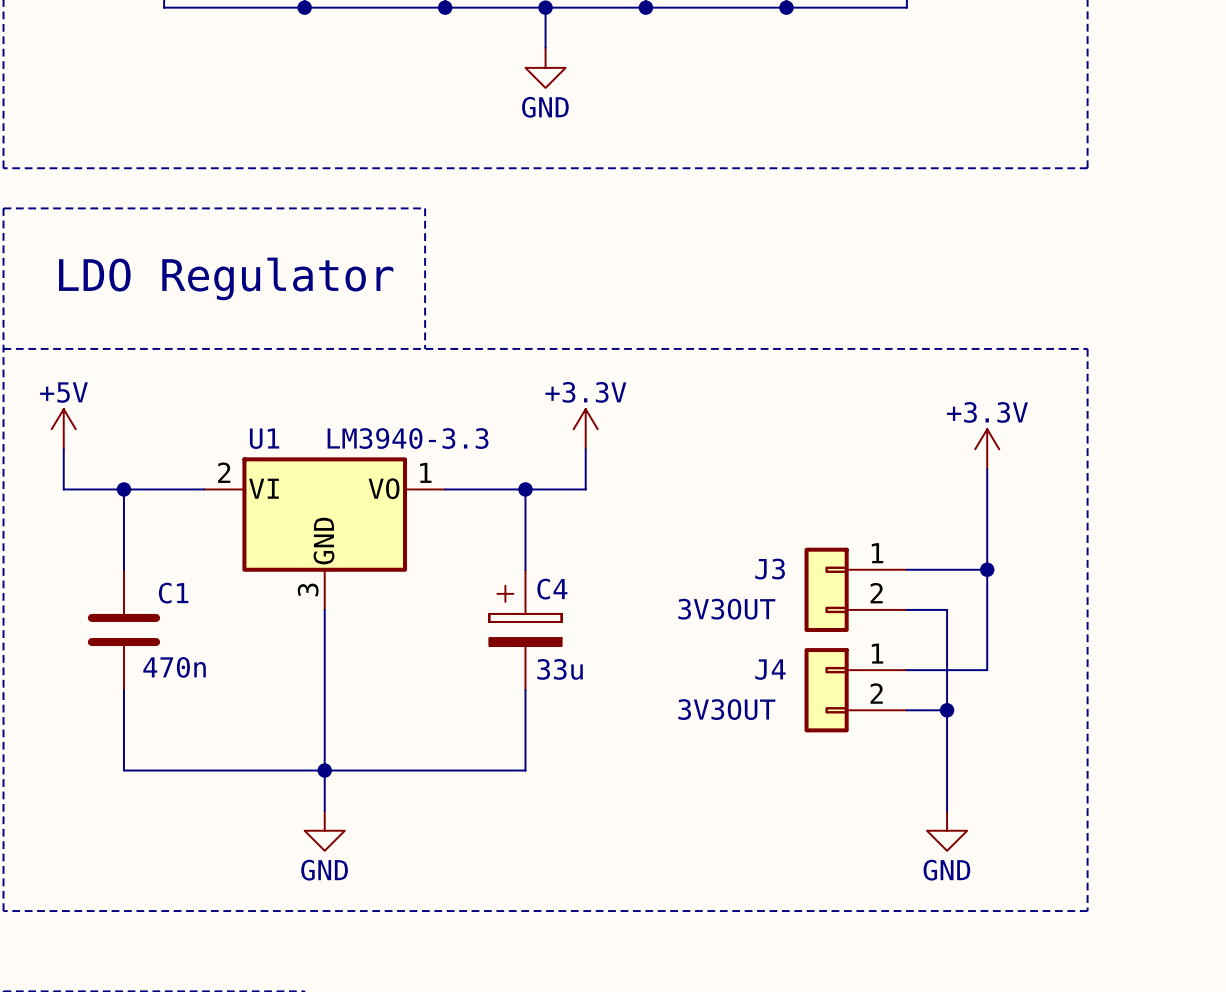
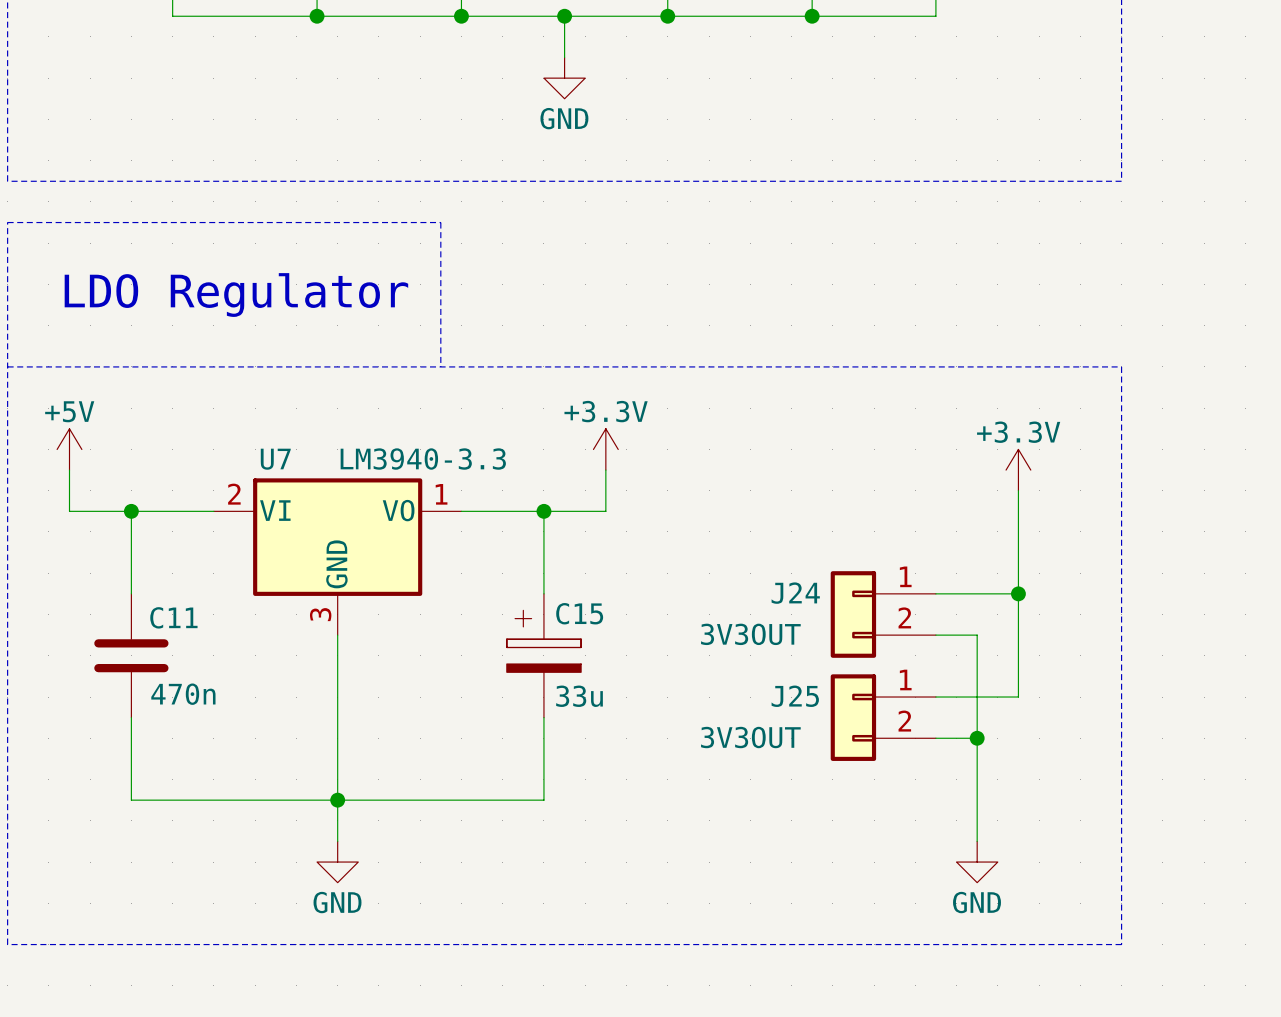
U1 name: U1 (264, 438) -> U7 (275, 459)
J3 name: J3 (770, 569) -> J24 (795, 593)
C4 name: C4 (552, 589) -> C15 (579, 613)
C1 name: C1 (173, 593) -> C11 (173, 617)
J4 name: J4 (770, 669) -> J25 (795, 696)

